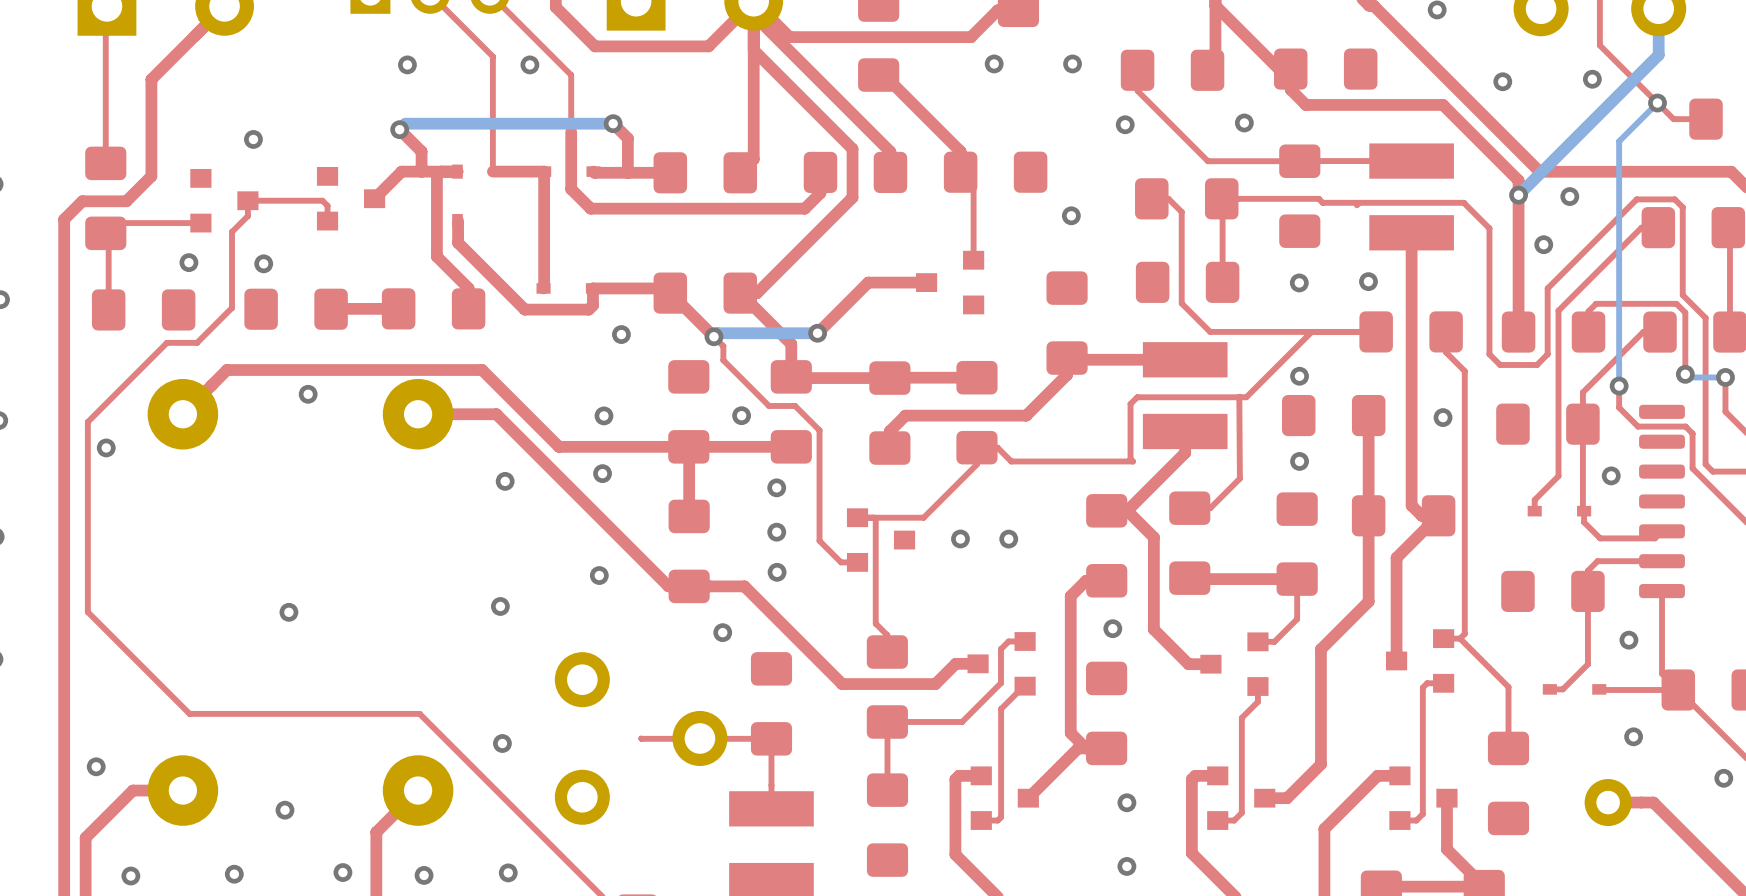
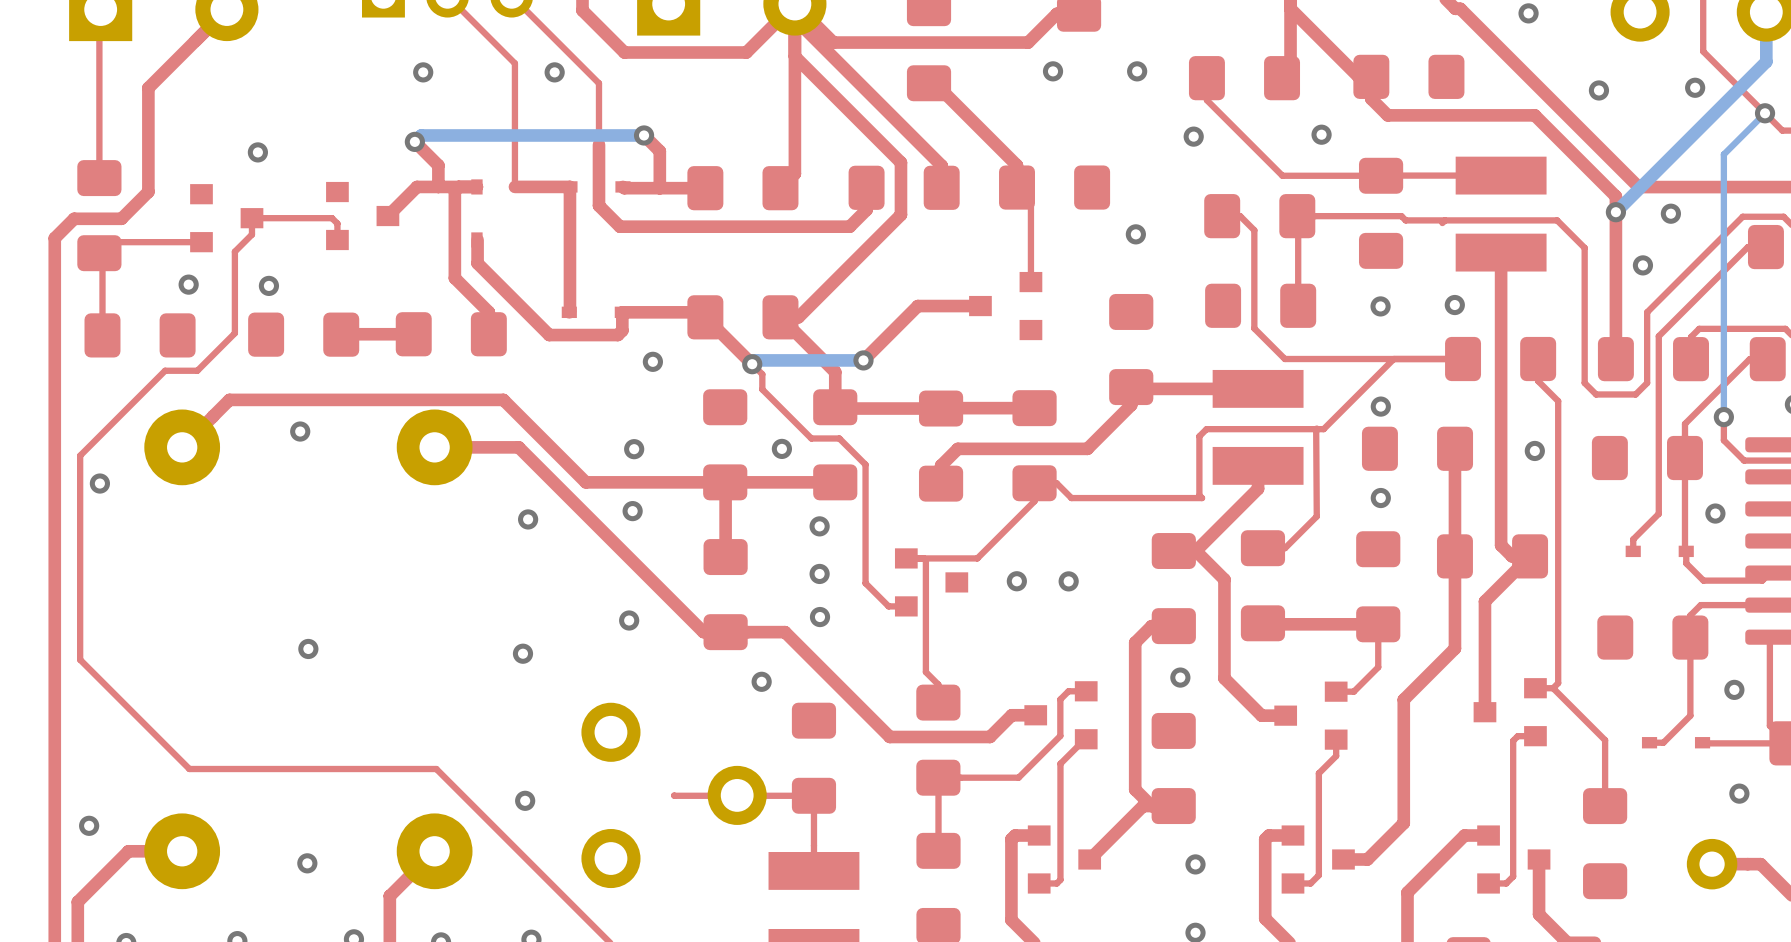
via position: (308, 394) -> (300, 431)
via position: (288, 612) -> (308, 648)
via position: (284, 810) -> (307, 863)

